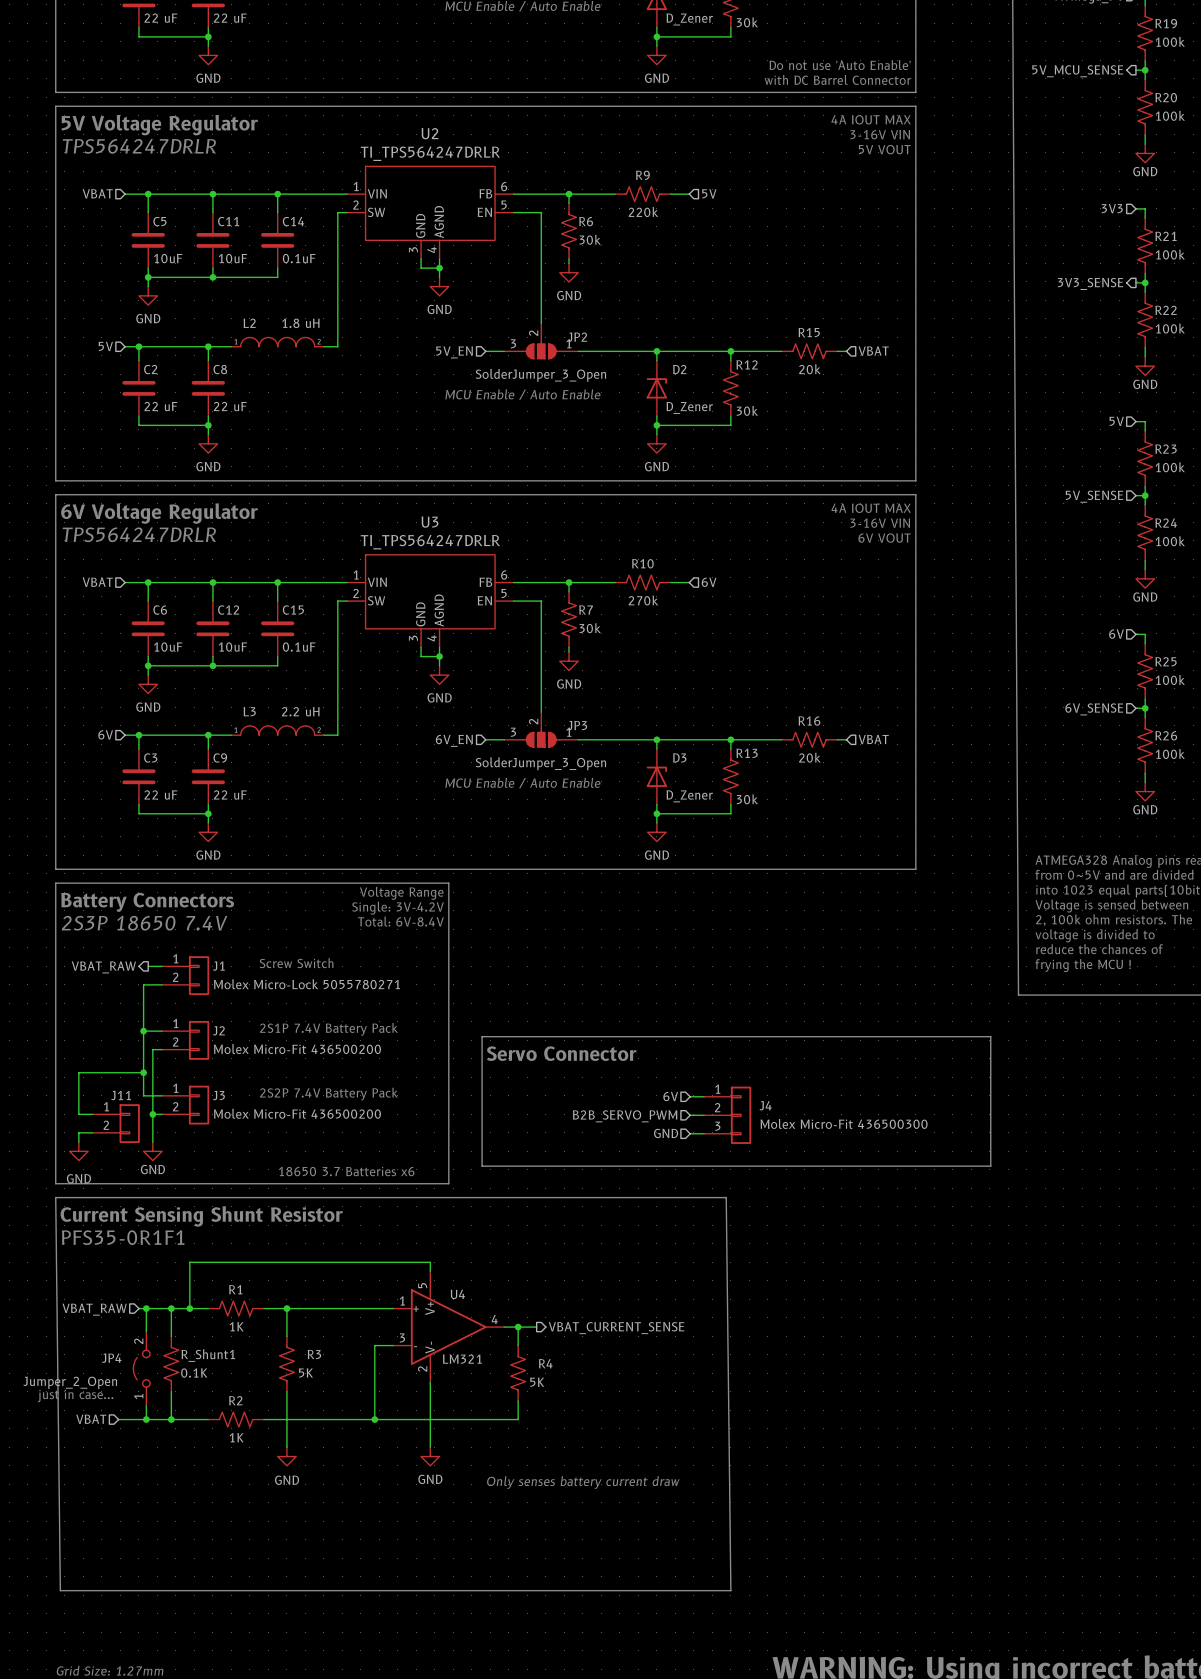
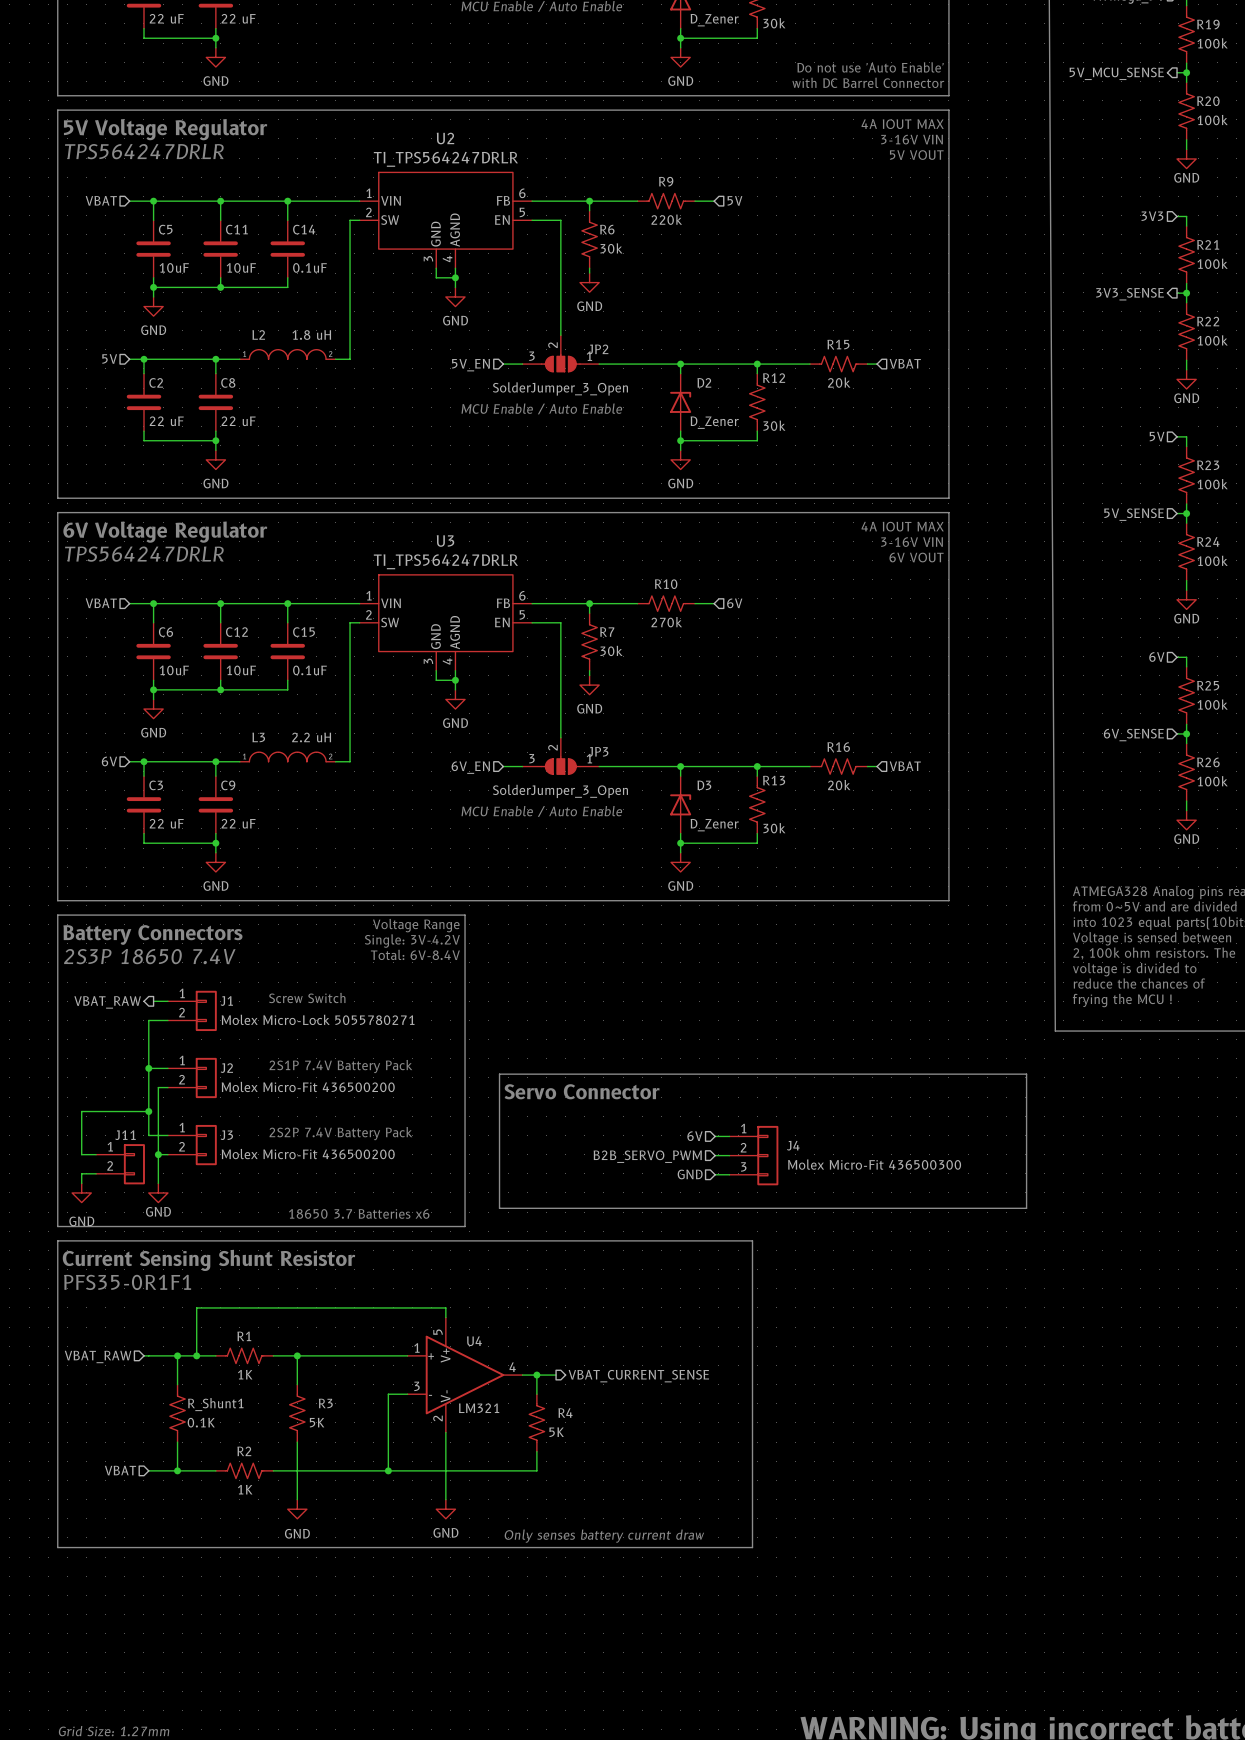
line: (55, 1197) (60, 1590) (730, 1590) (726, 1197) -> (57, 1240) (57, 1547) (752, 1547) (752, 1240)
wire: (146, 1308) (146, 1331) -> none
junction: (146, 1308) -> none
JP4: Jumper_2_Open (141, 1368) -> none
text: just in case... (75, 1396) -> none
wire: (146, 1405) (146, 1419) -> none
hierarchical label position: VBAT (91, 1419) -> VBAT (120, 1470)
wire: (118, 1419) (143, 1419) -> none
junction: (146, 1419) -> none

